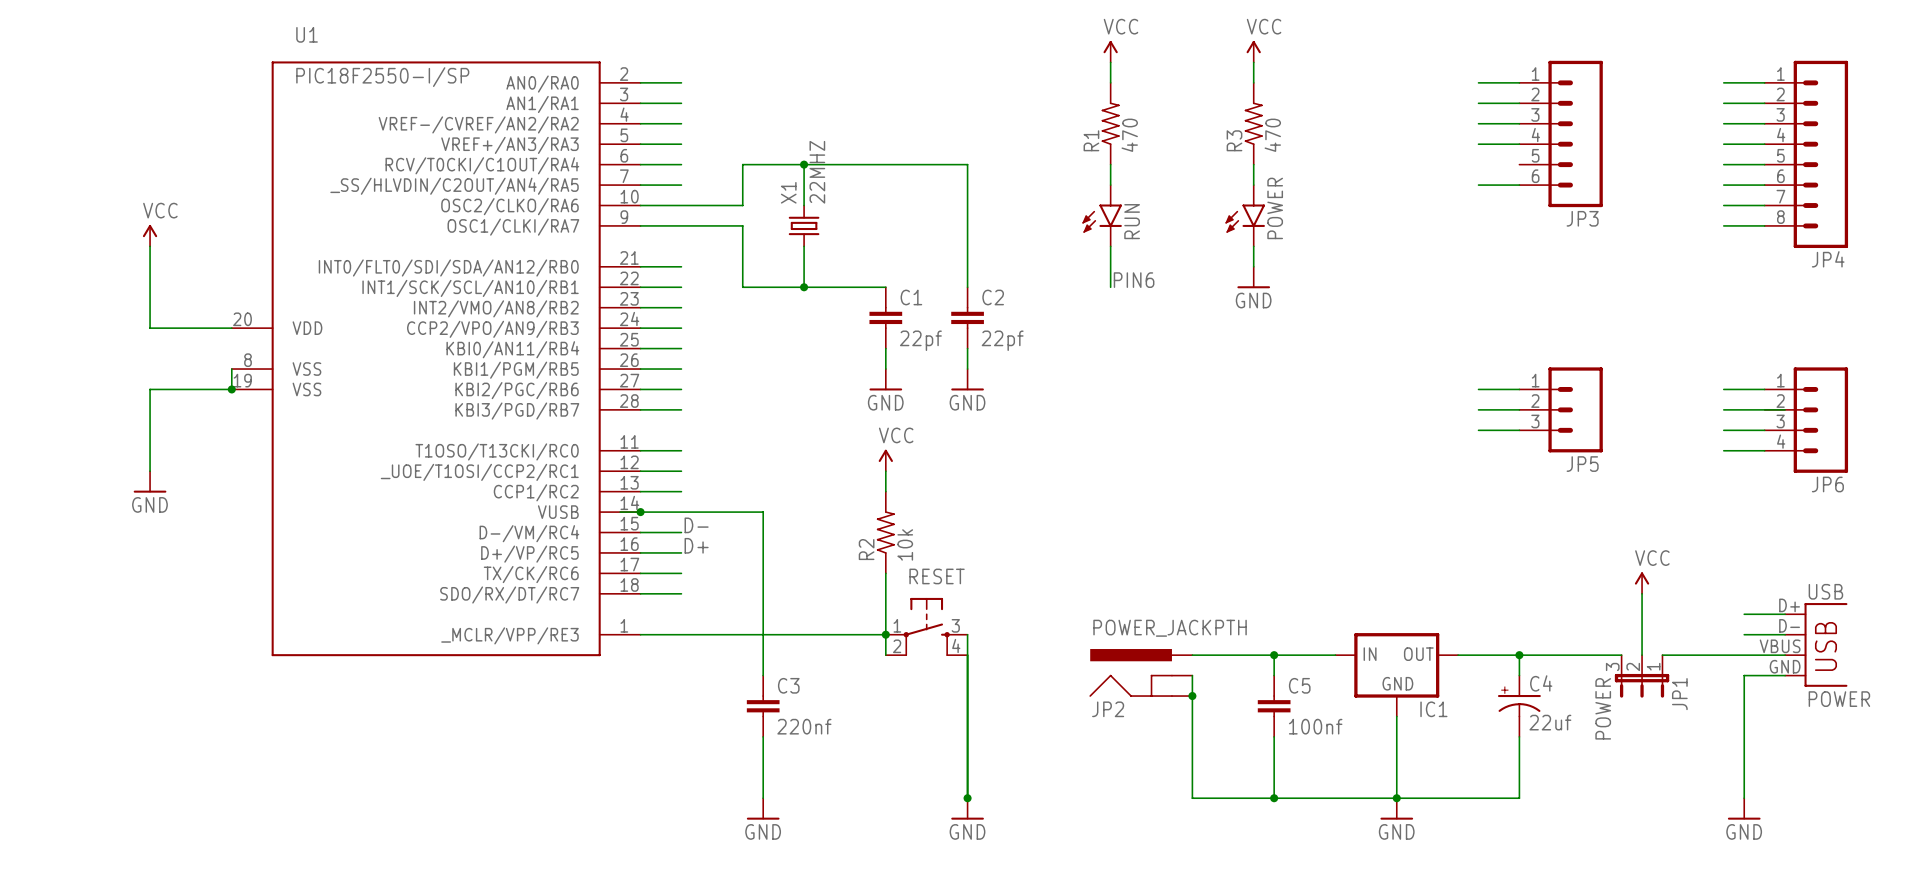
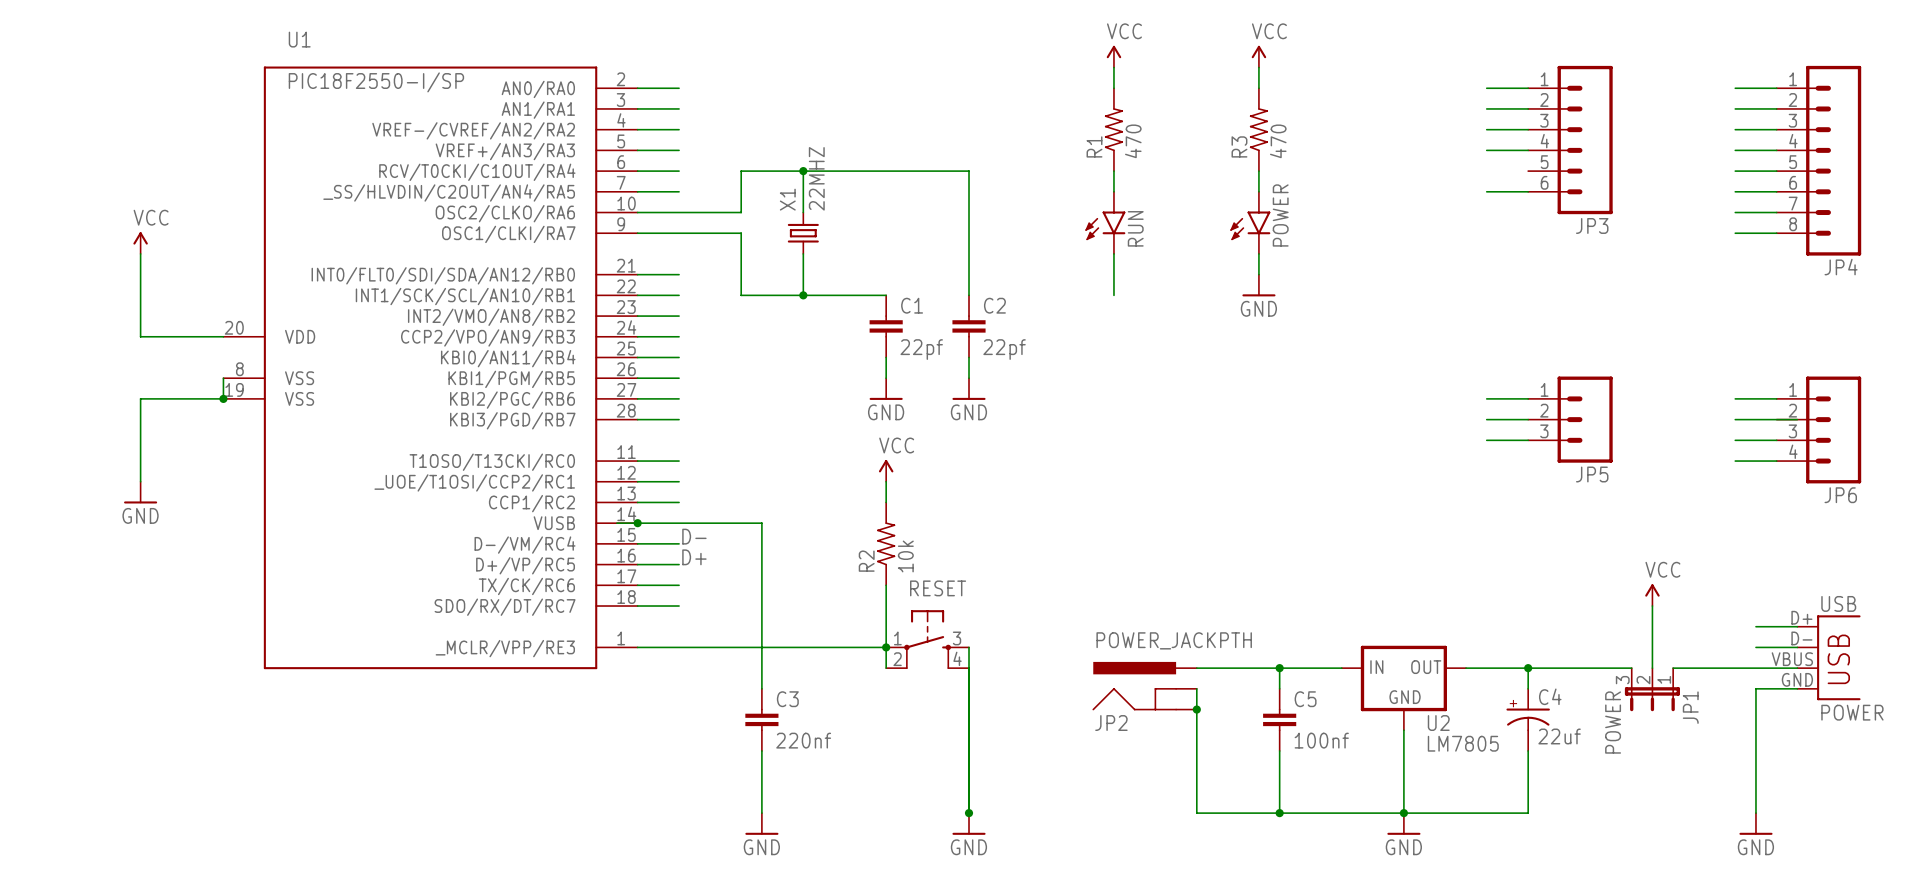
label: PIN6 (1134, 280) -> none
IC1 name: IC1 (1433, 709) -> U2 (1438, 723)
IC1 value: none -> LM7805 (1463, 743)

